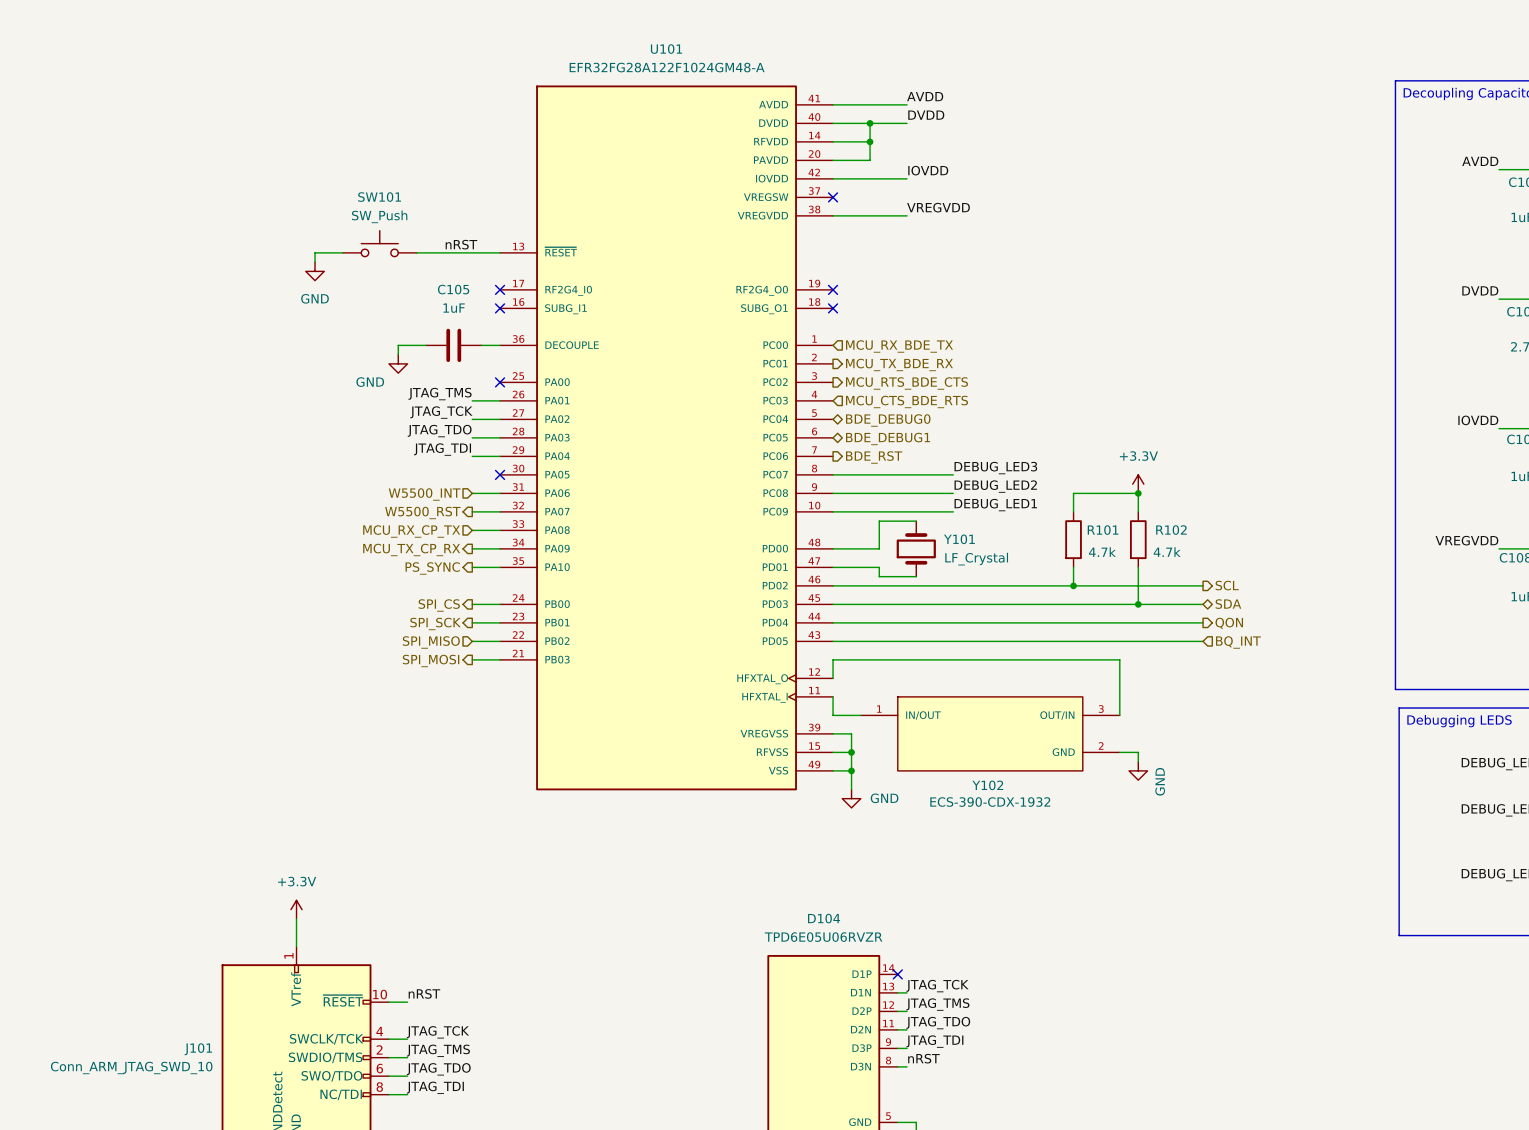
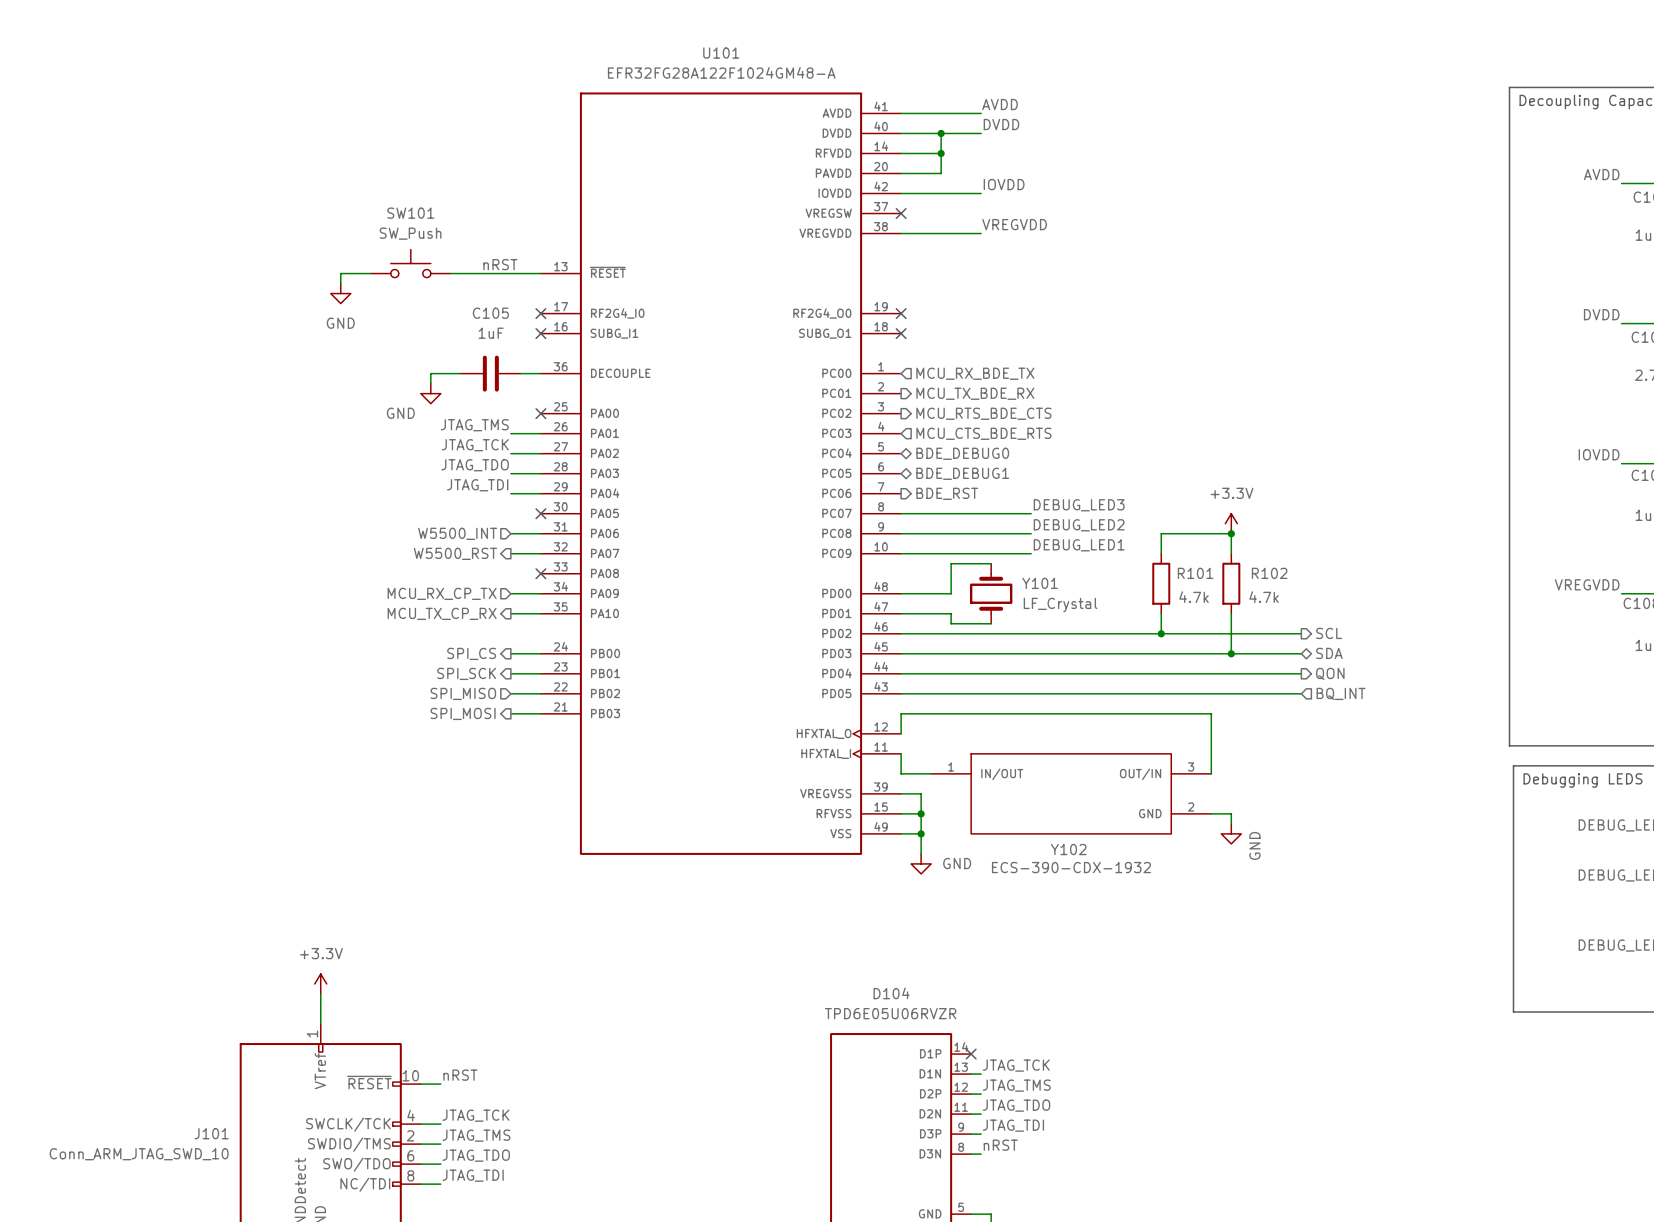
wire: (472, 530) (500, 530) -> none
no-connect mark: none -> (540, 573)
hierarchical label: MCU_RX_CP_TX (411, 531) -> none
hierarchical label shape: output (411, 549) -> input (442, 593)
hierarchical label: MCU_TX_CP_RX (411, 549) -> MCU_RX_CP_TX (442, 593)
hierarchical label: PS_SYNC (432, 568) -> MCU_TX_CP_RX (442, 613)

